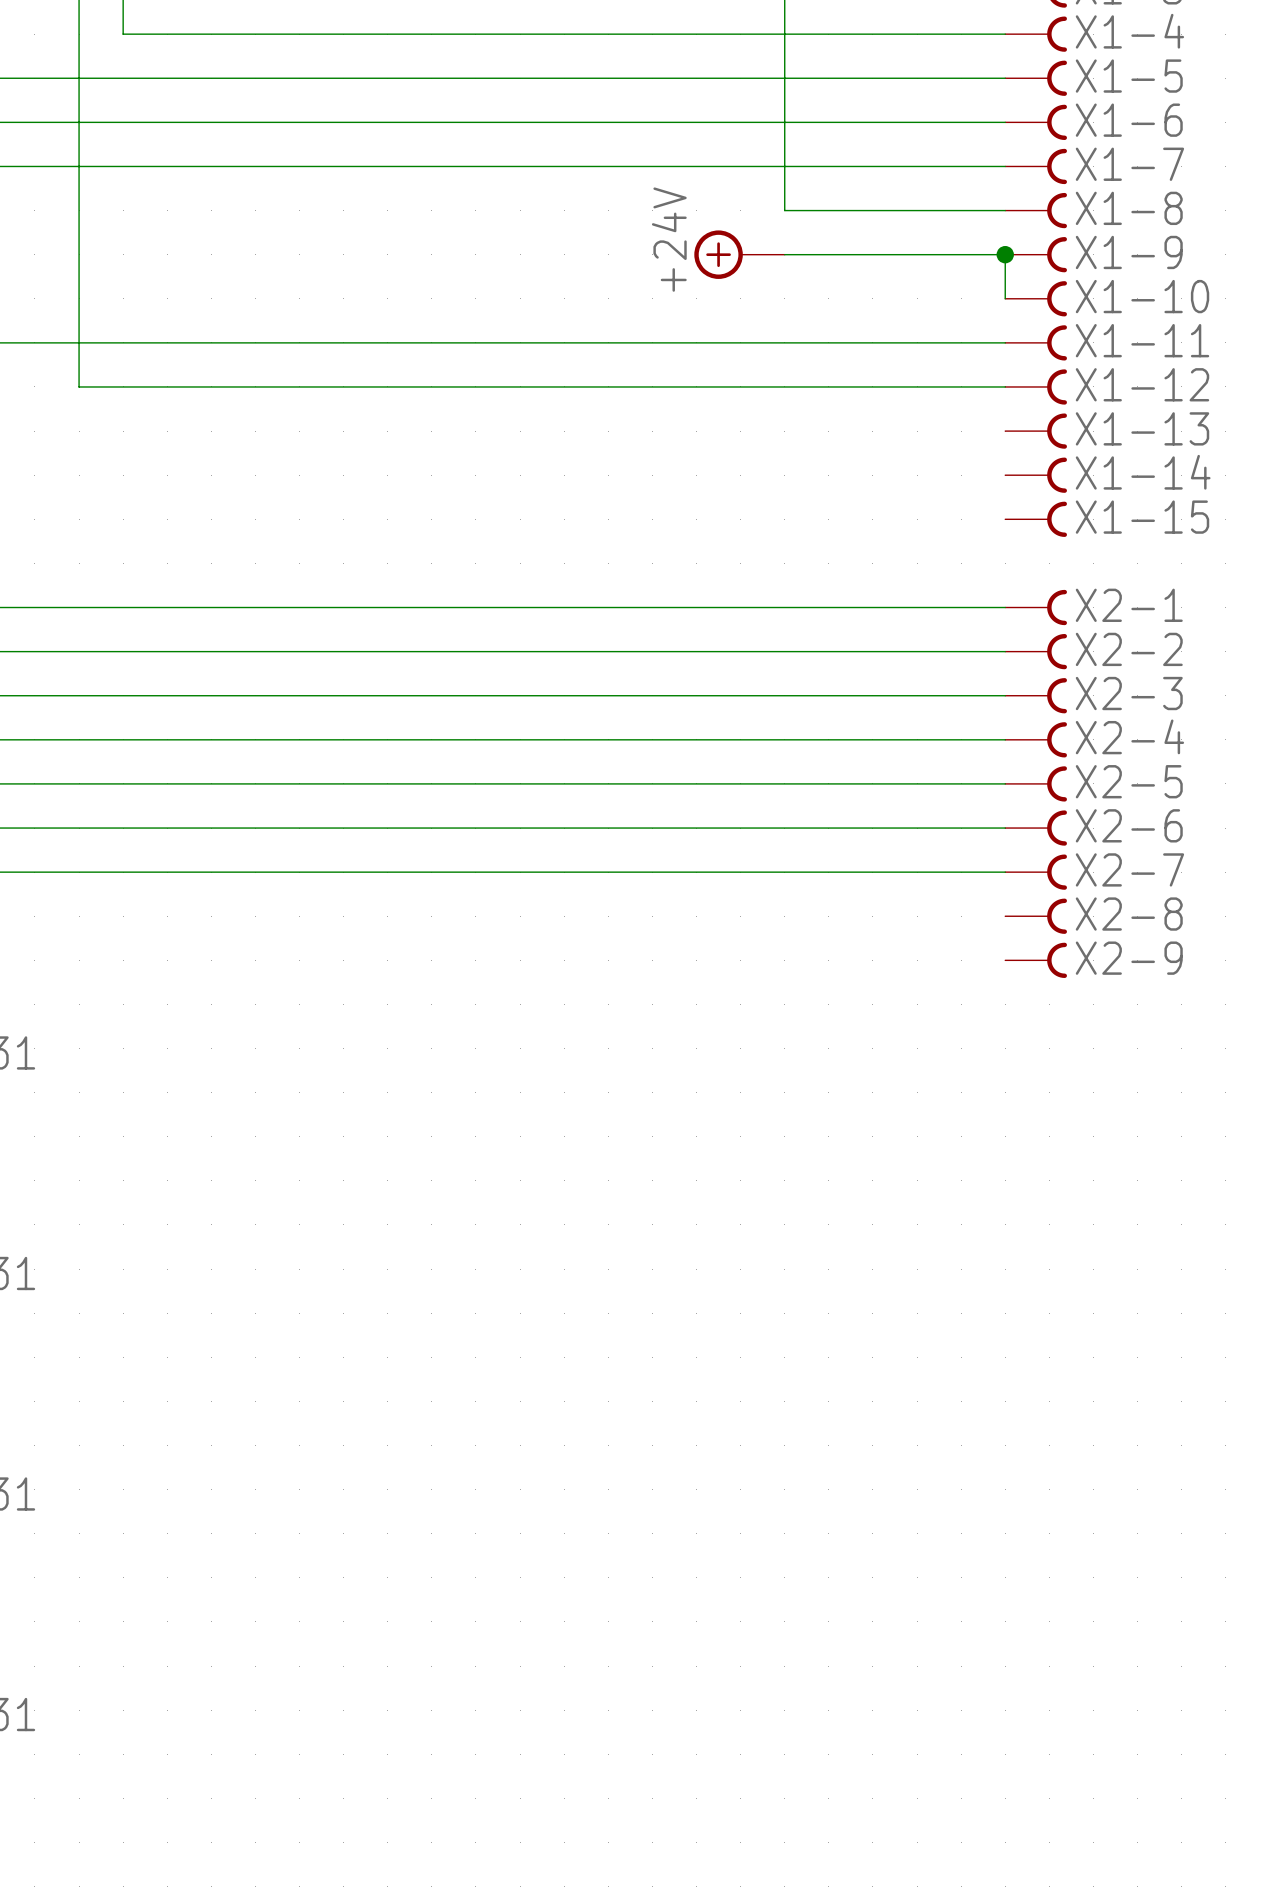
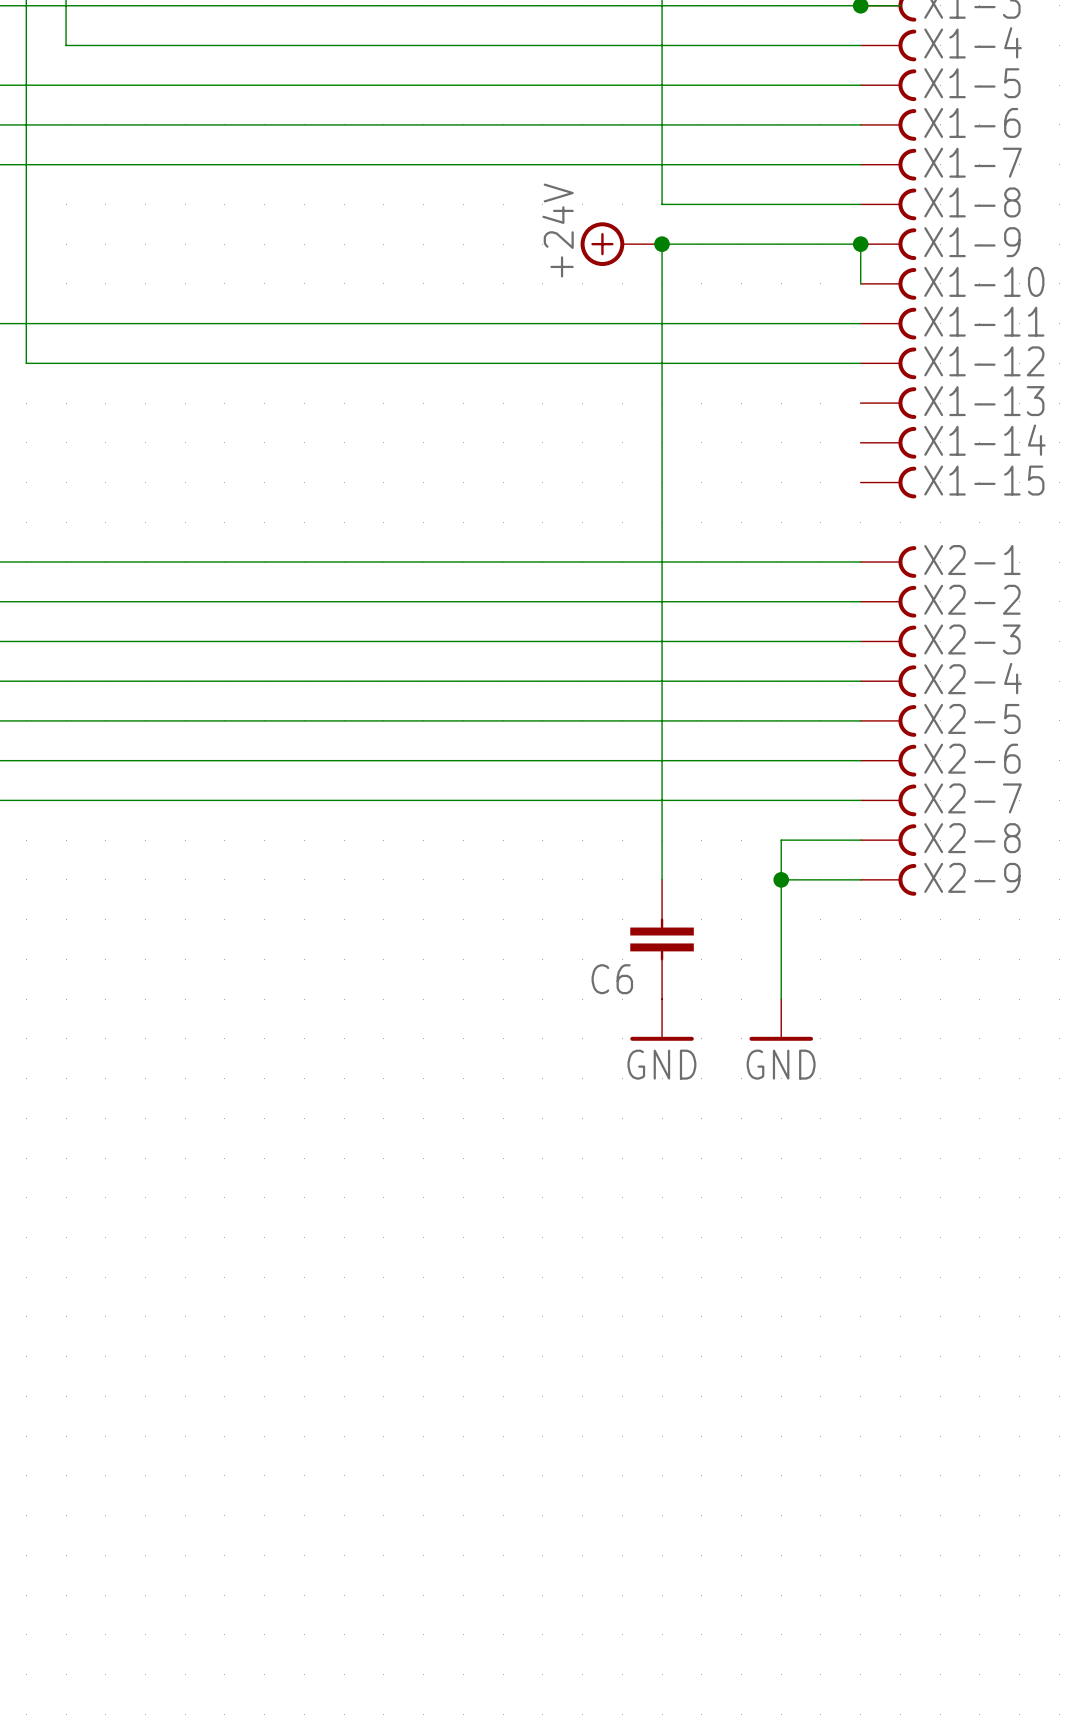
wire: none -> (662, 244) (662, 879)
junction: none -> (662, 244)
wire: none -> (860, 840) (781, 840) (781, 999)
wire: none -> (781, 879) (860, 879)
junction: none -> (781, 879)
C6: none -> (662, 939)
power symbol: none -> GND (662, 1019)
power symbol: none -> GND (781, 1019)

